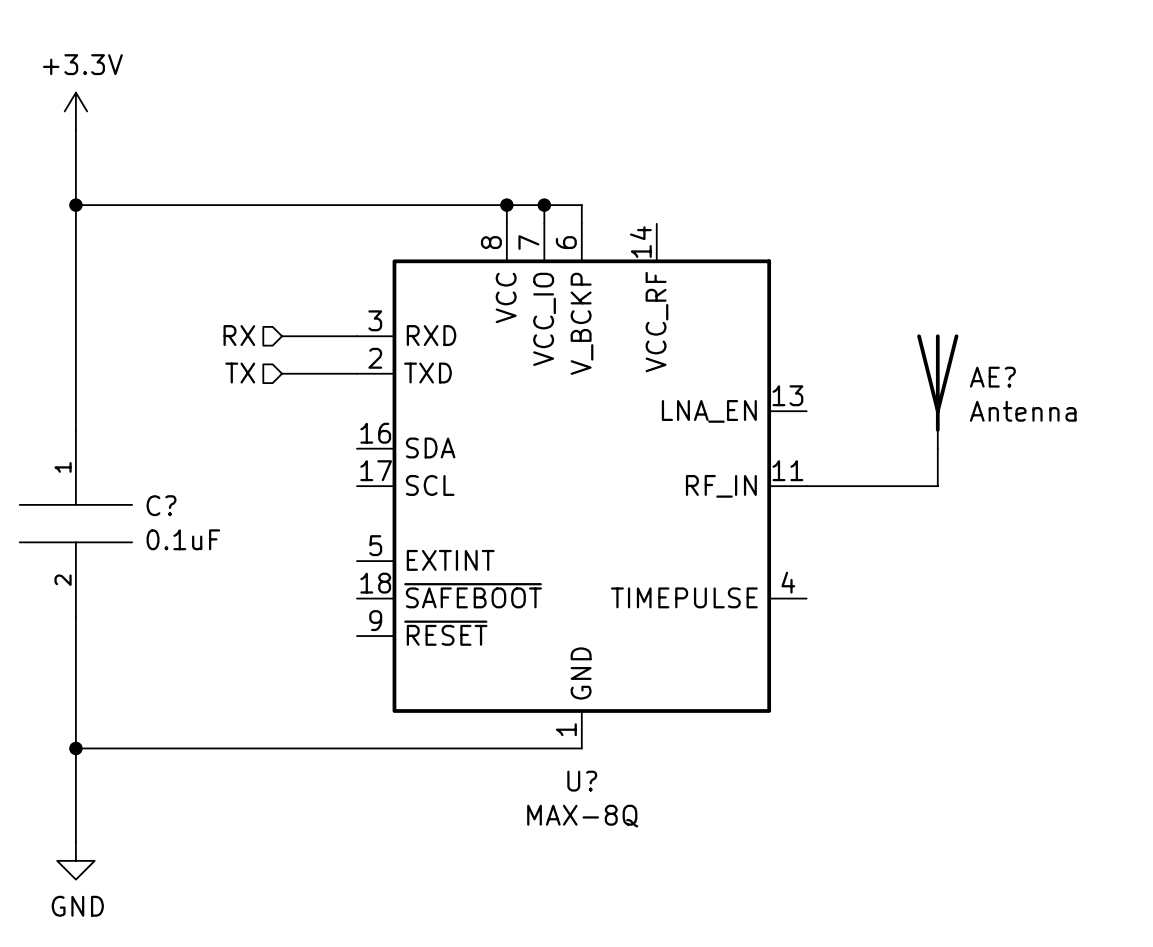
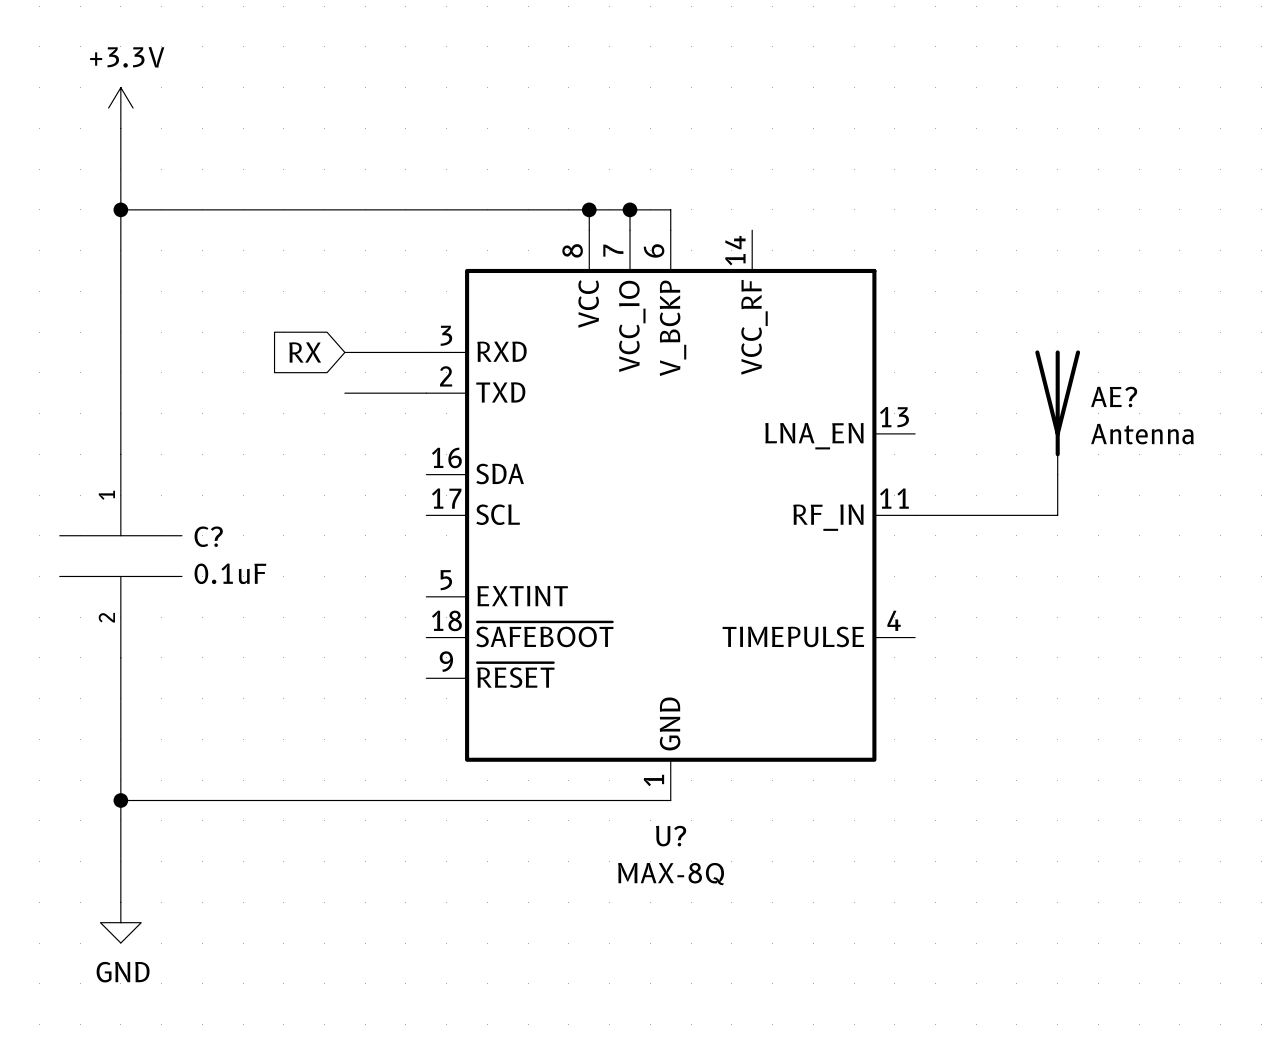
hierarchical label: RX (239, 335) -> none
global label: none -> RX (305, 352)
hierarchical label: TX (240, 373) -> none

